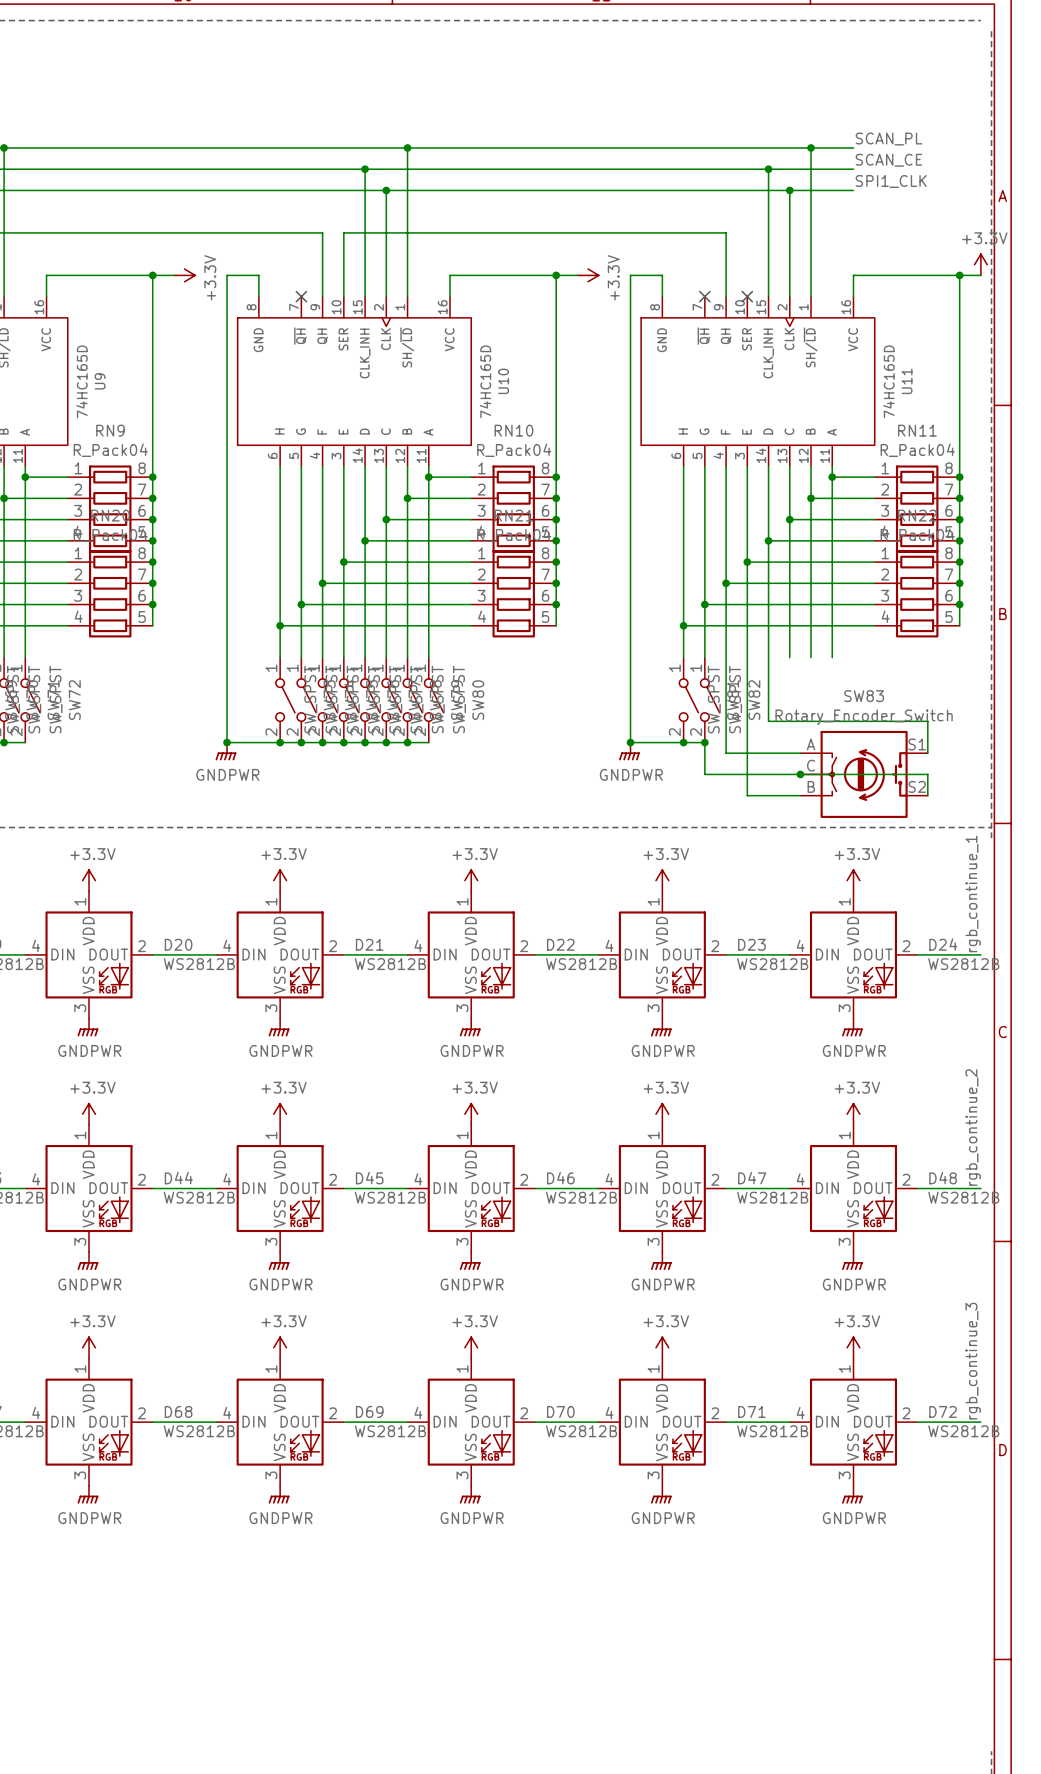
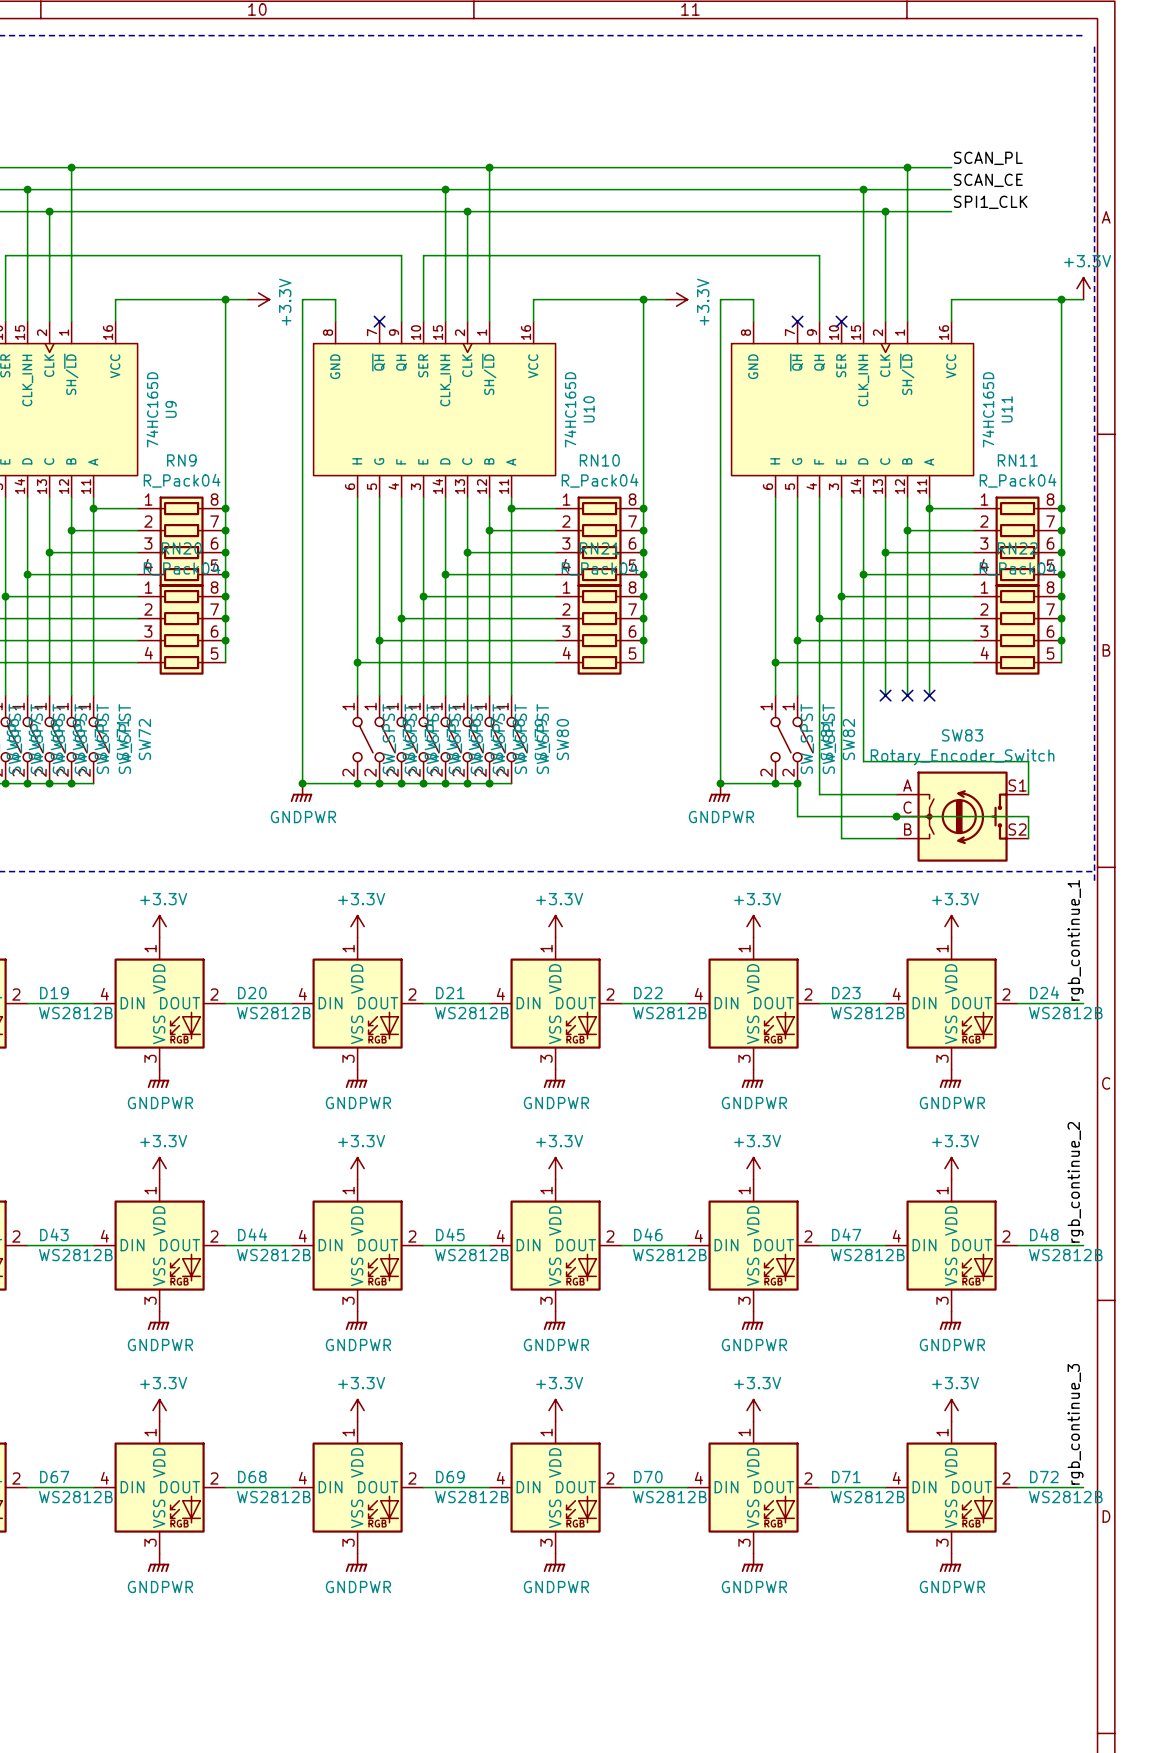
no-connect mark: none -> (885, 695)
no-connect mark: none -> (907, 695)
no-connect mark: none -> (929, 695)

